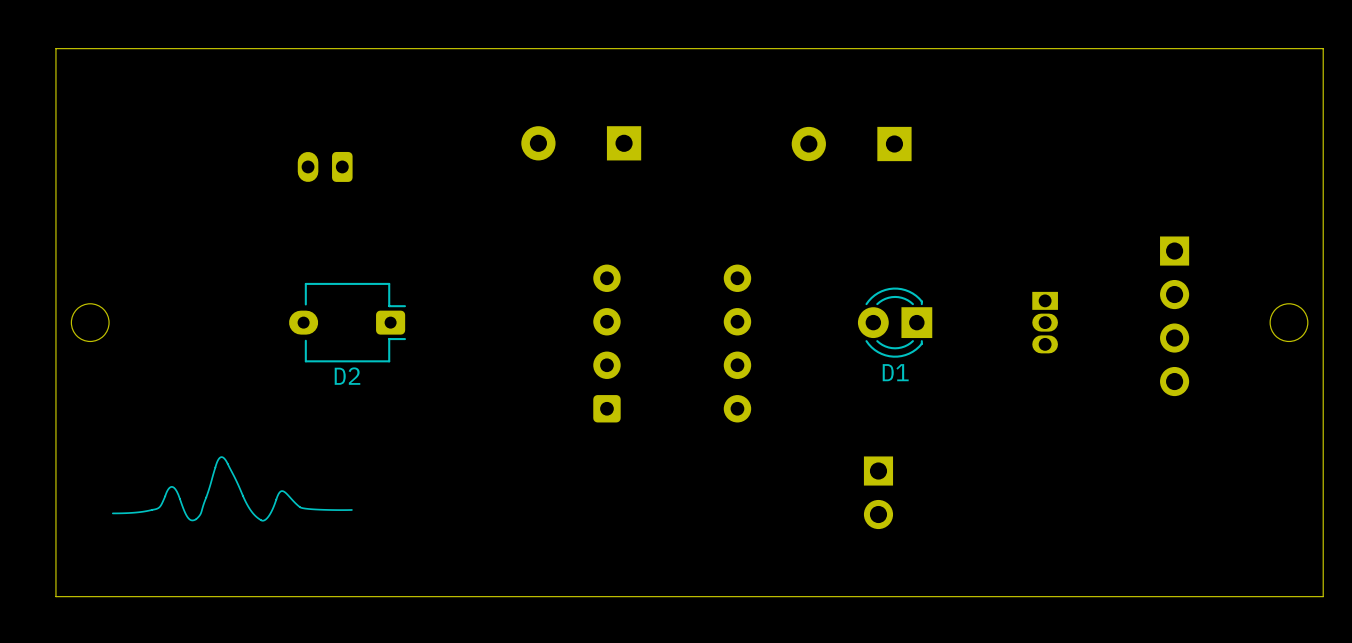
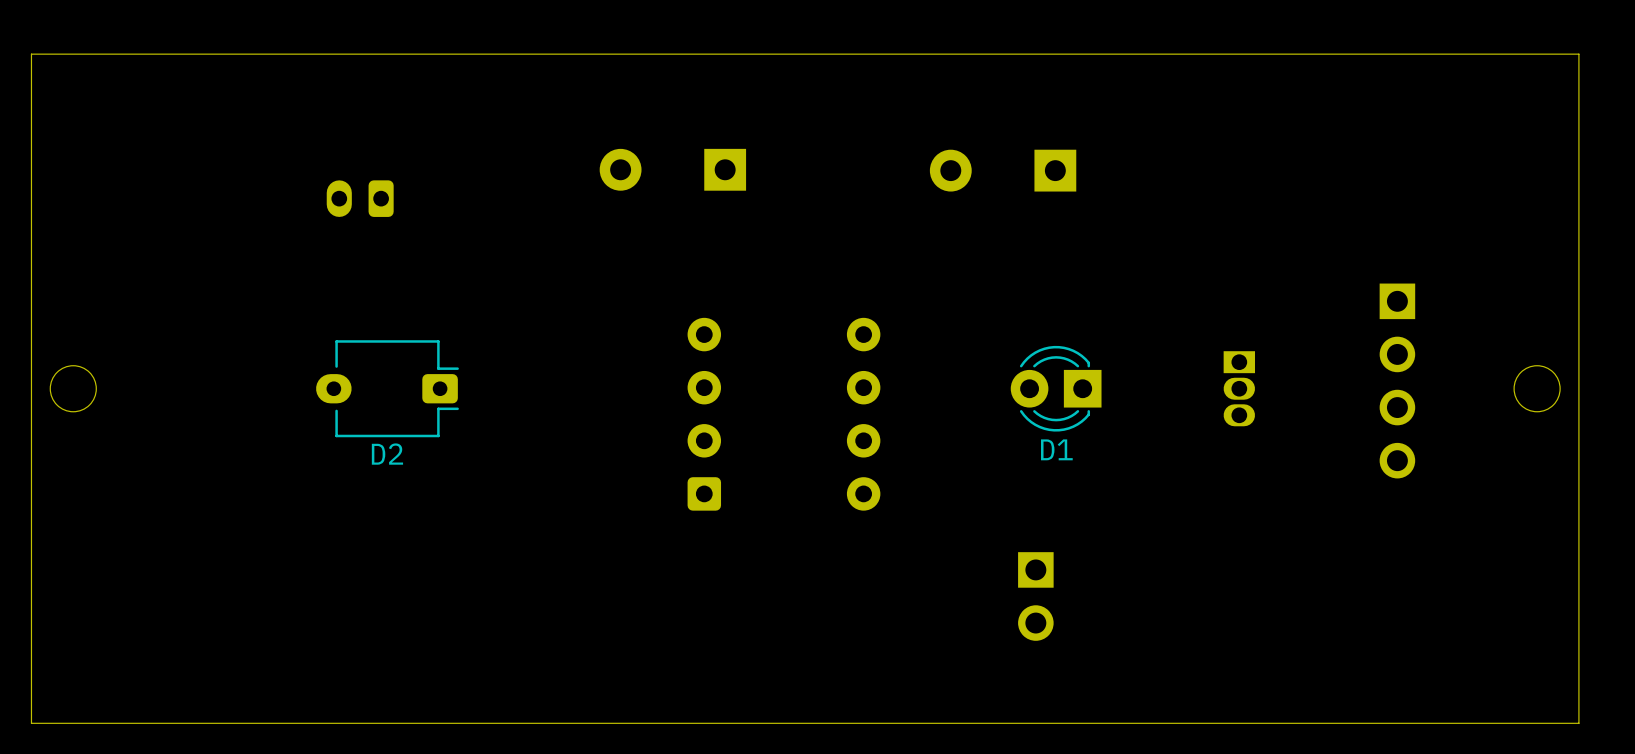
line: (351, 509) (301, 507) (281, 491) (278, 494) (268, 516) (261, 520) (249, 508) (226, 462) (221, 457) (216, 462) (200, 513) (194, 519) (190, 520) (187, 517) (176, 491) (171, 486) (157, 508) (138, 512) (112, 513) -> none

